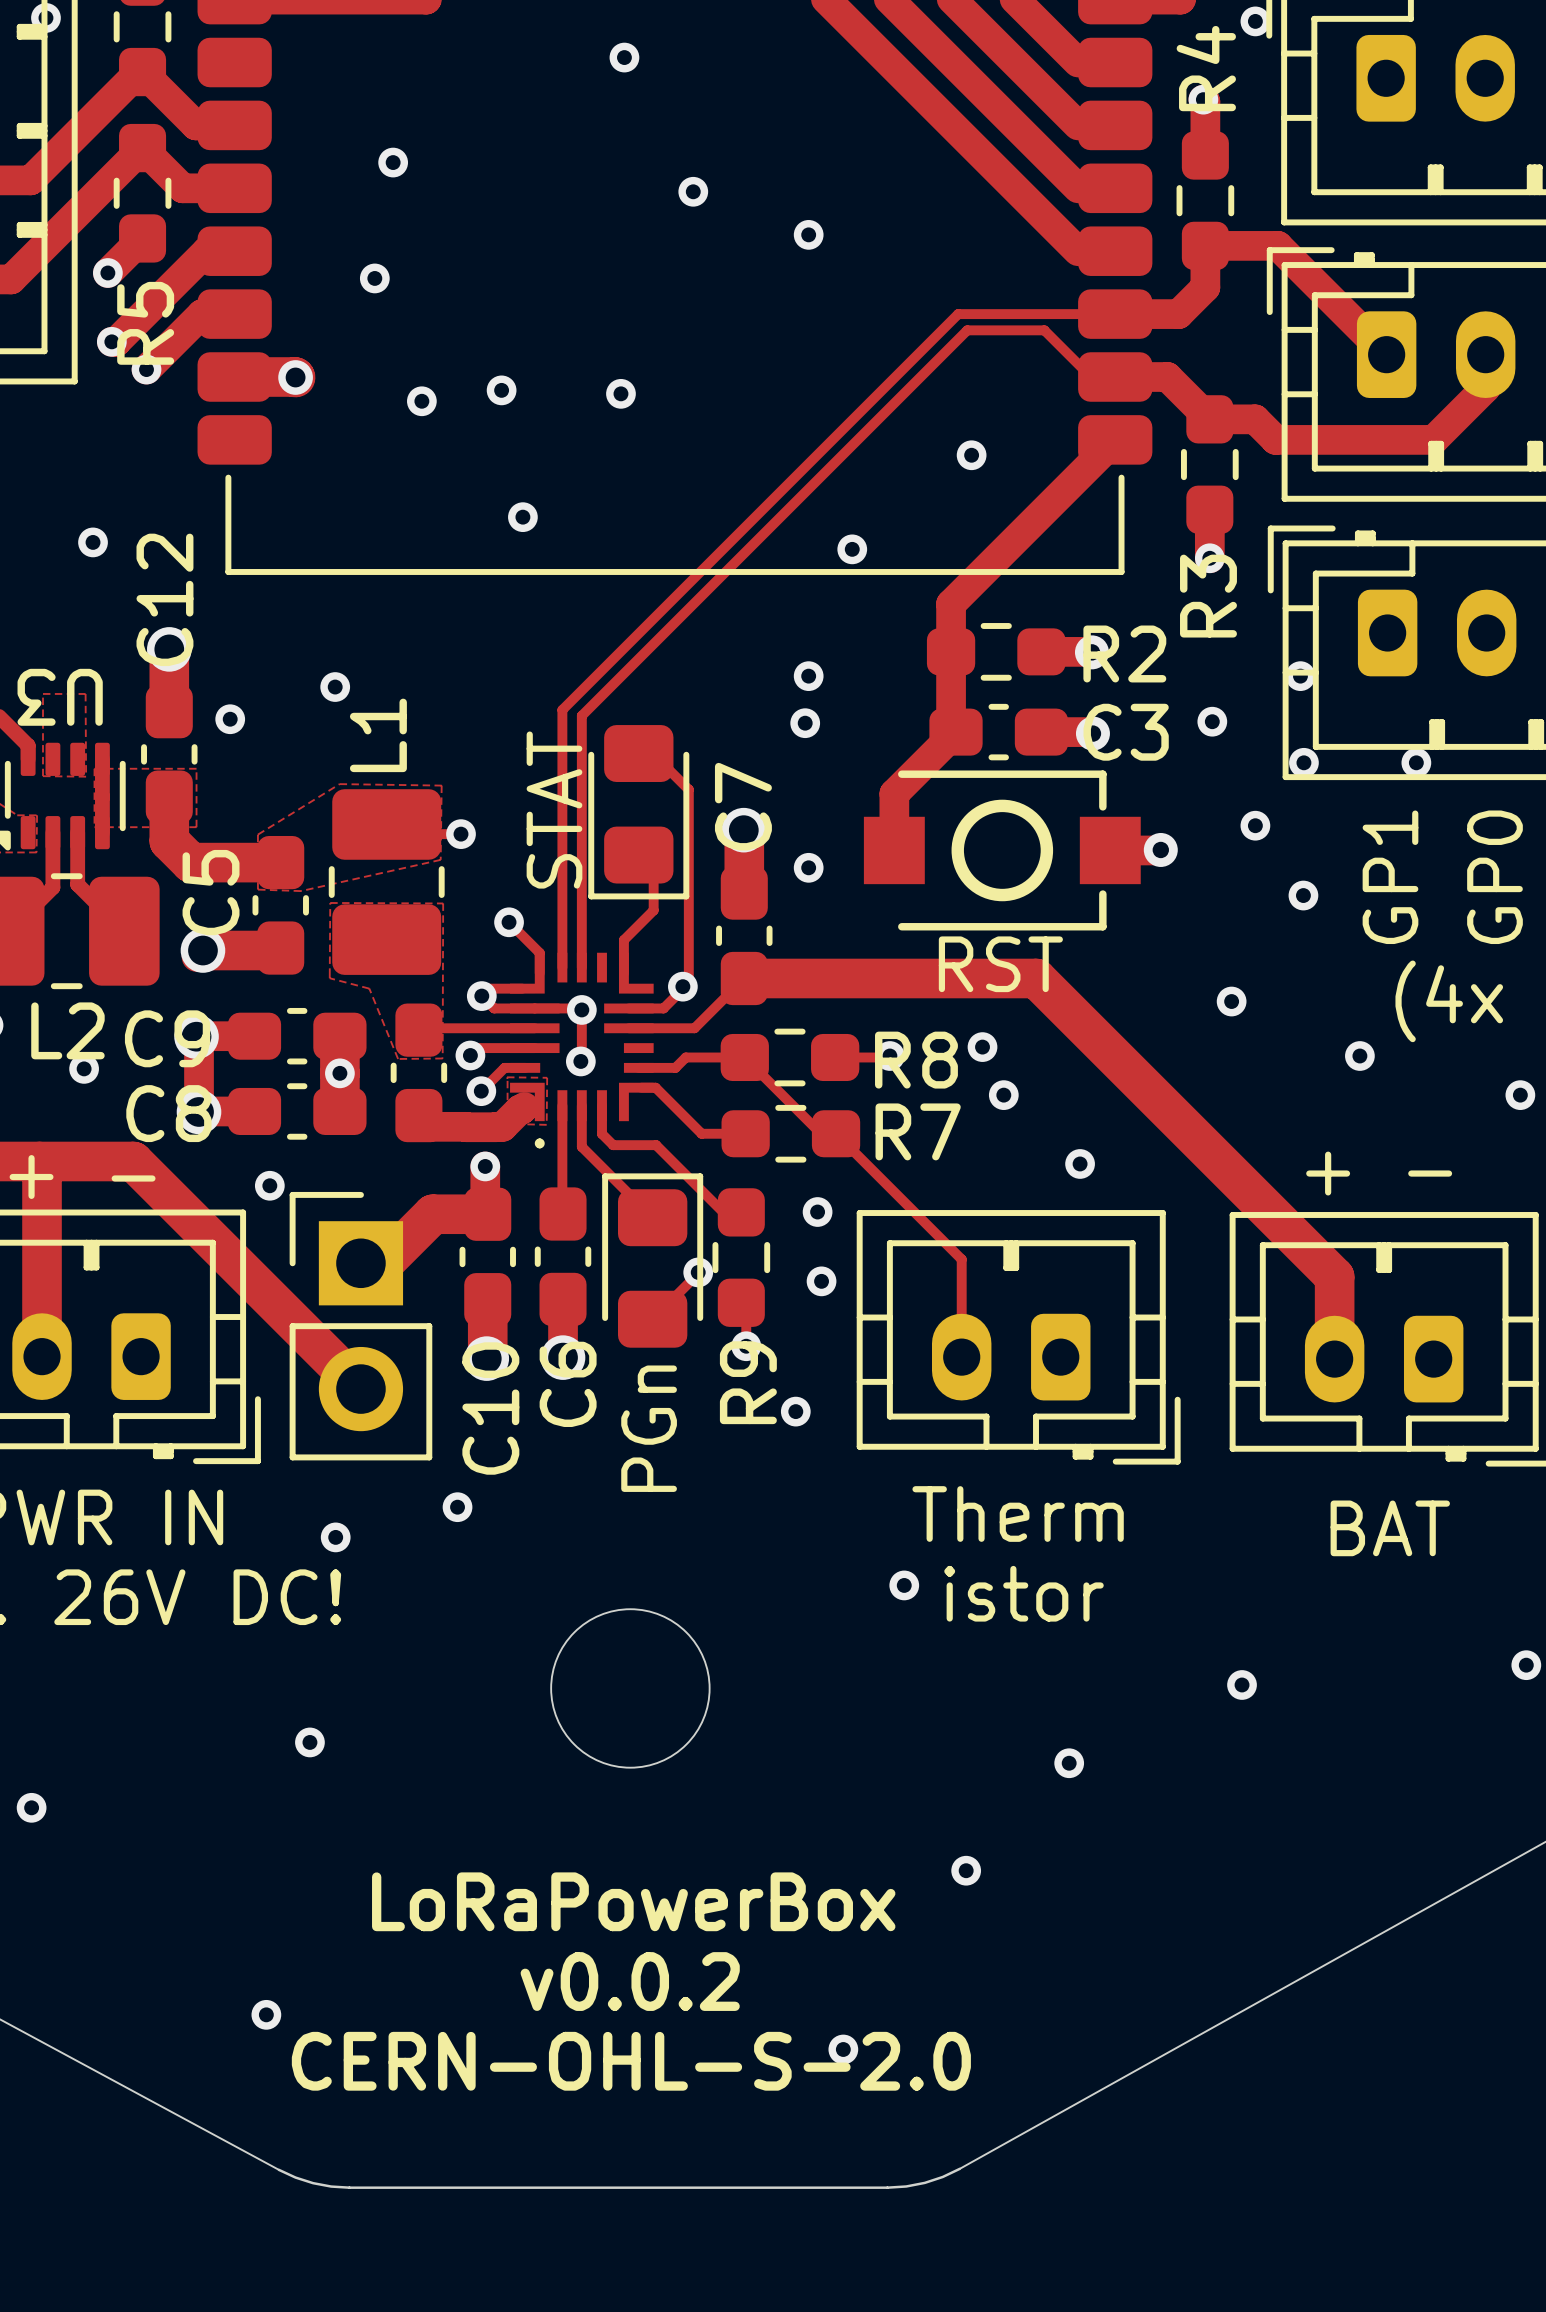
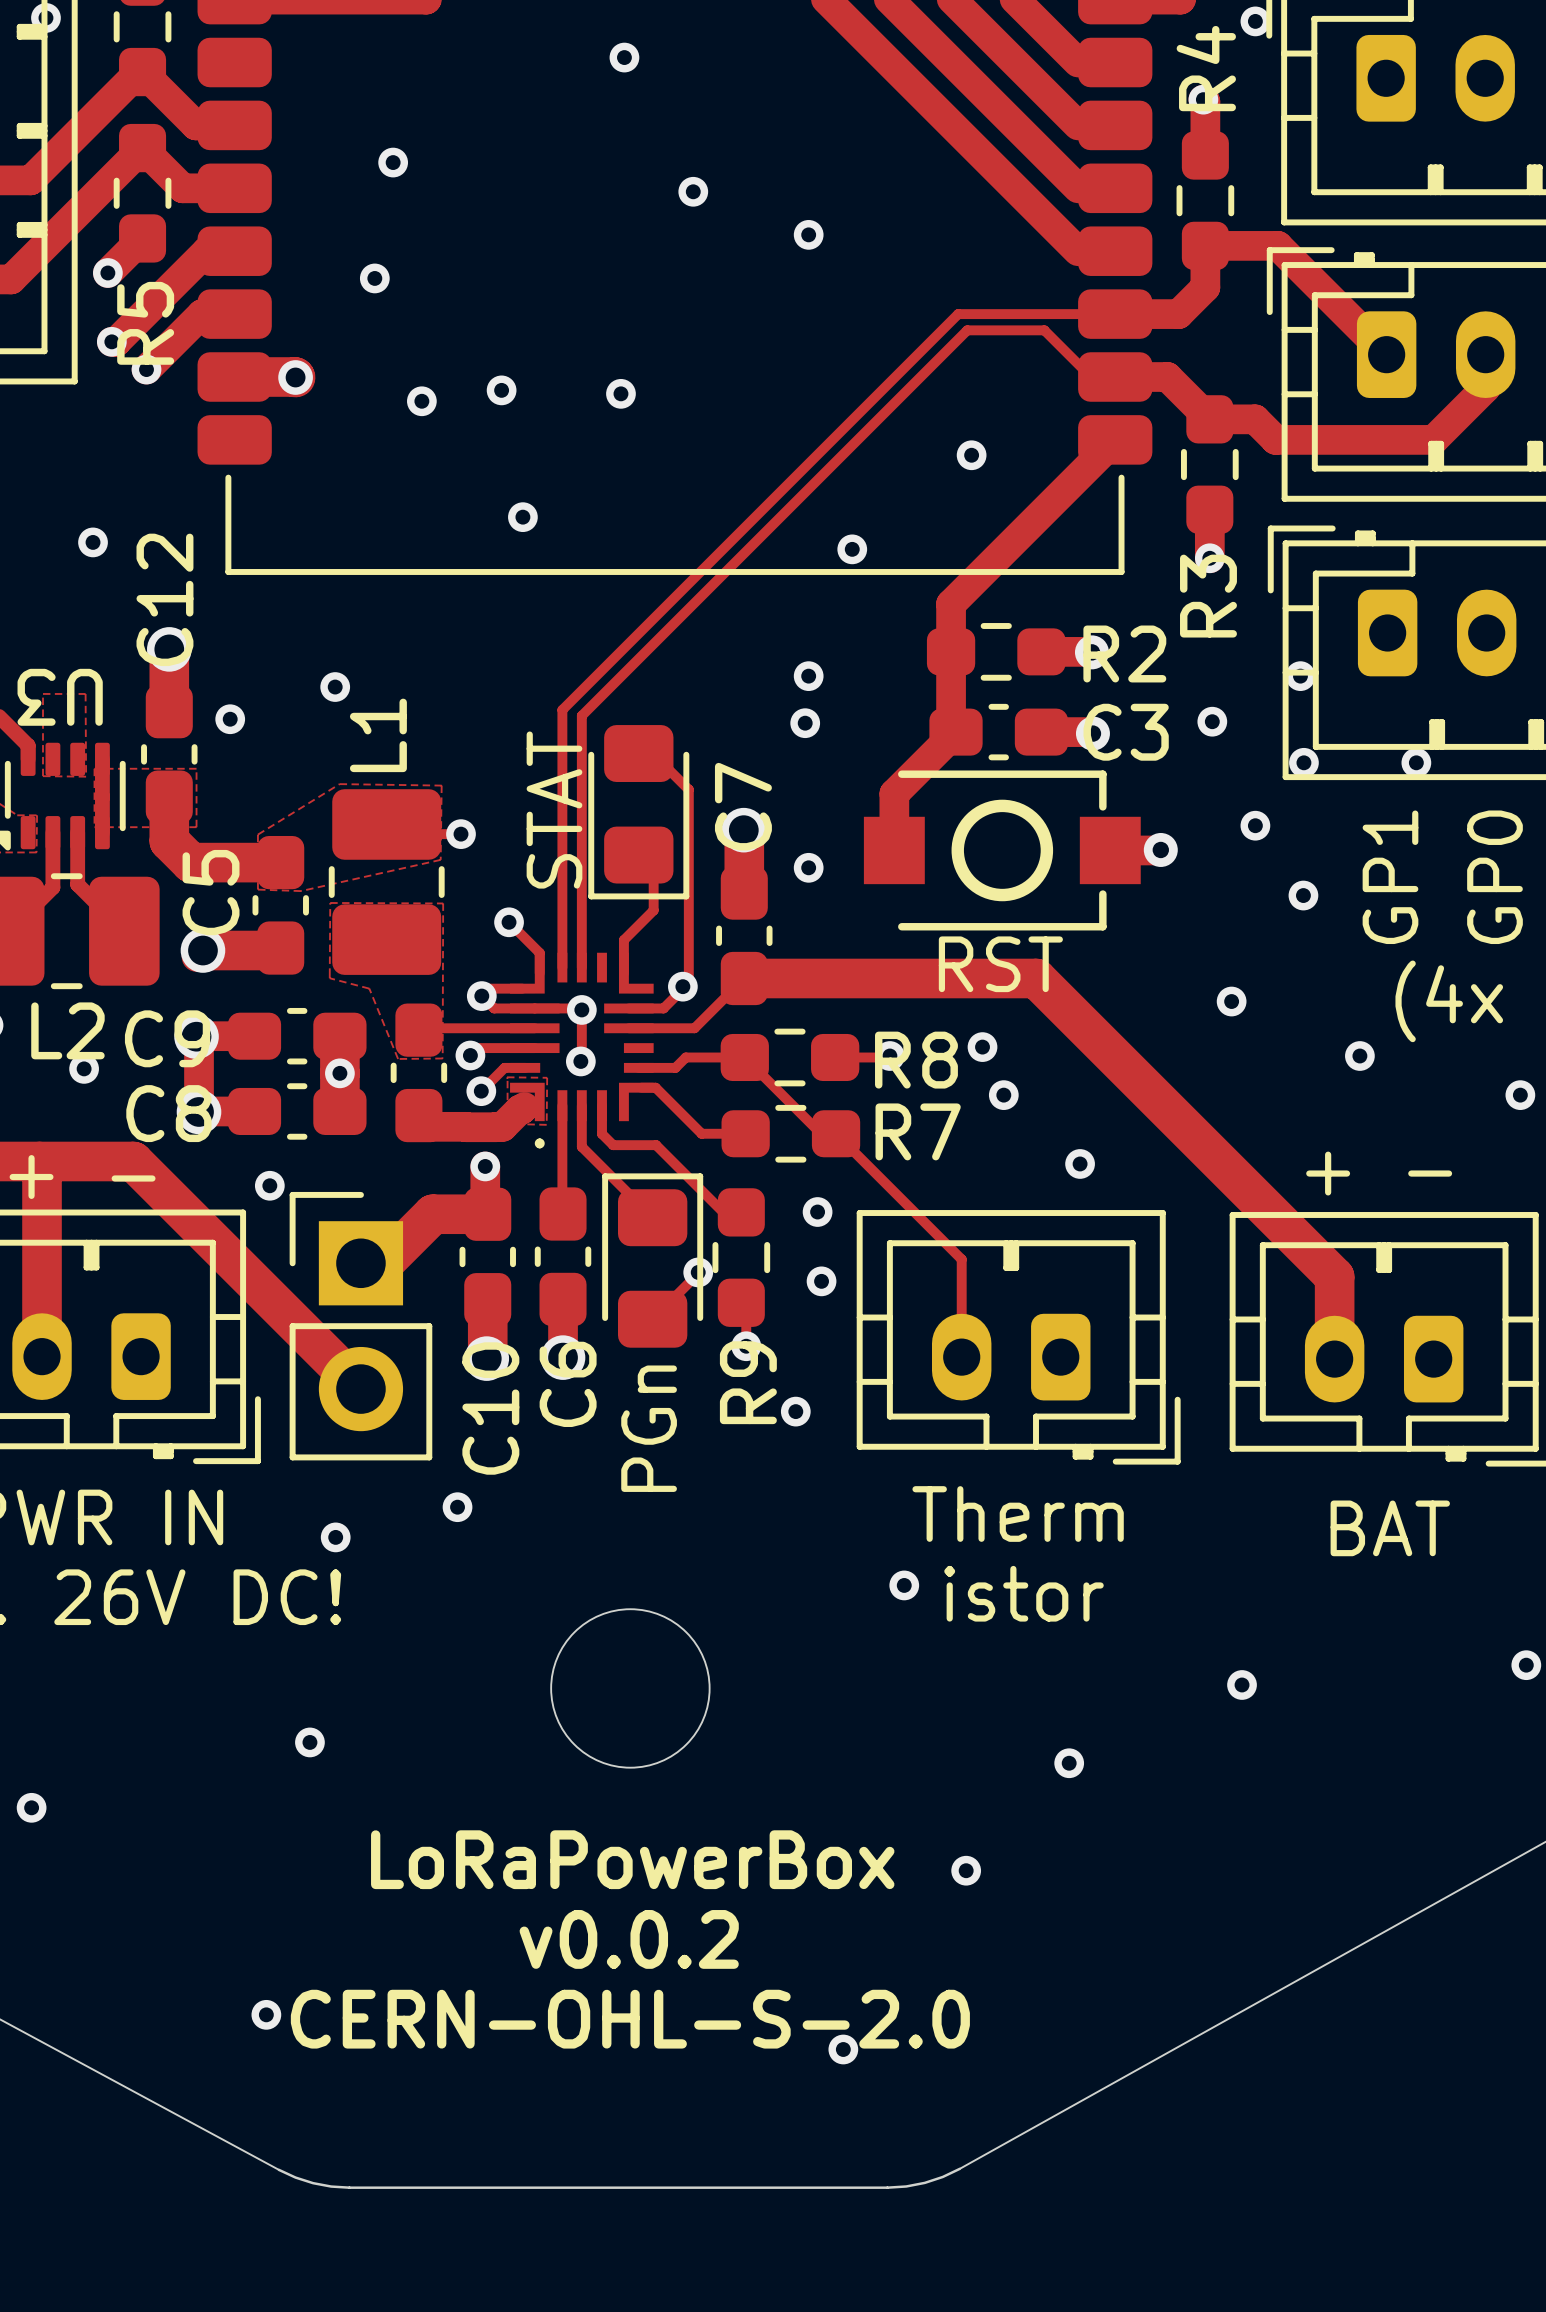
text position: LoRaPowerBox (633, 1901) -> LoRaPowerBox (632, 1859)
text position: v0.0.2 (630, 1981) -> v0.0.2 (629, 1939)
text position: CERN-OHL-S-2.0 (631, 2061) -> CERN-OHL-S-2.0 (630, 2019)

